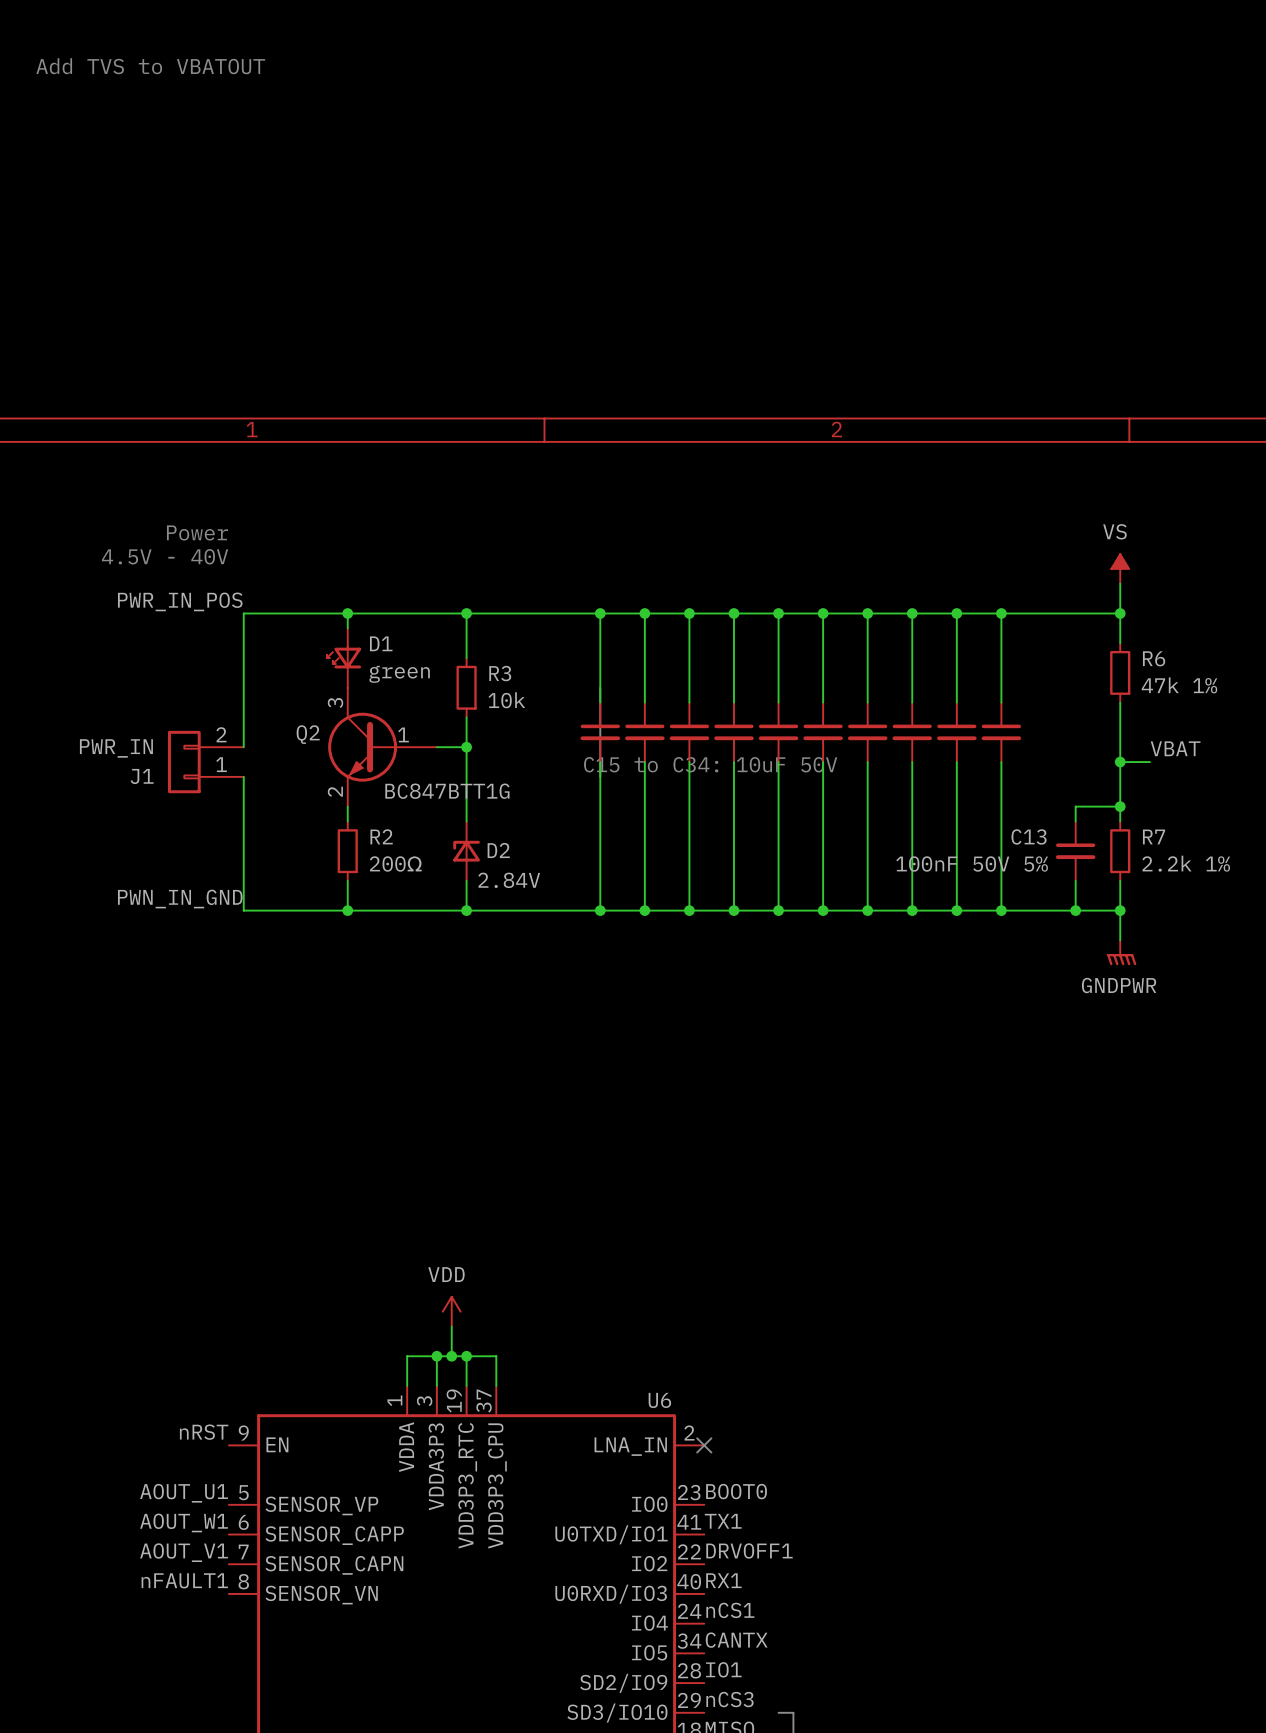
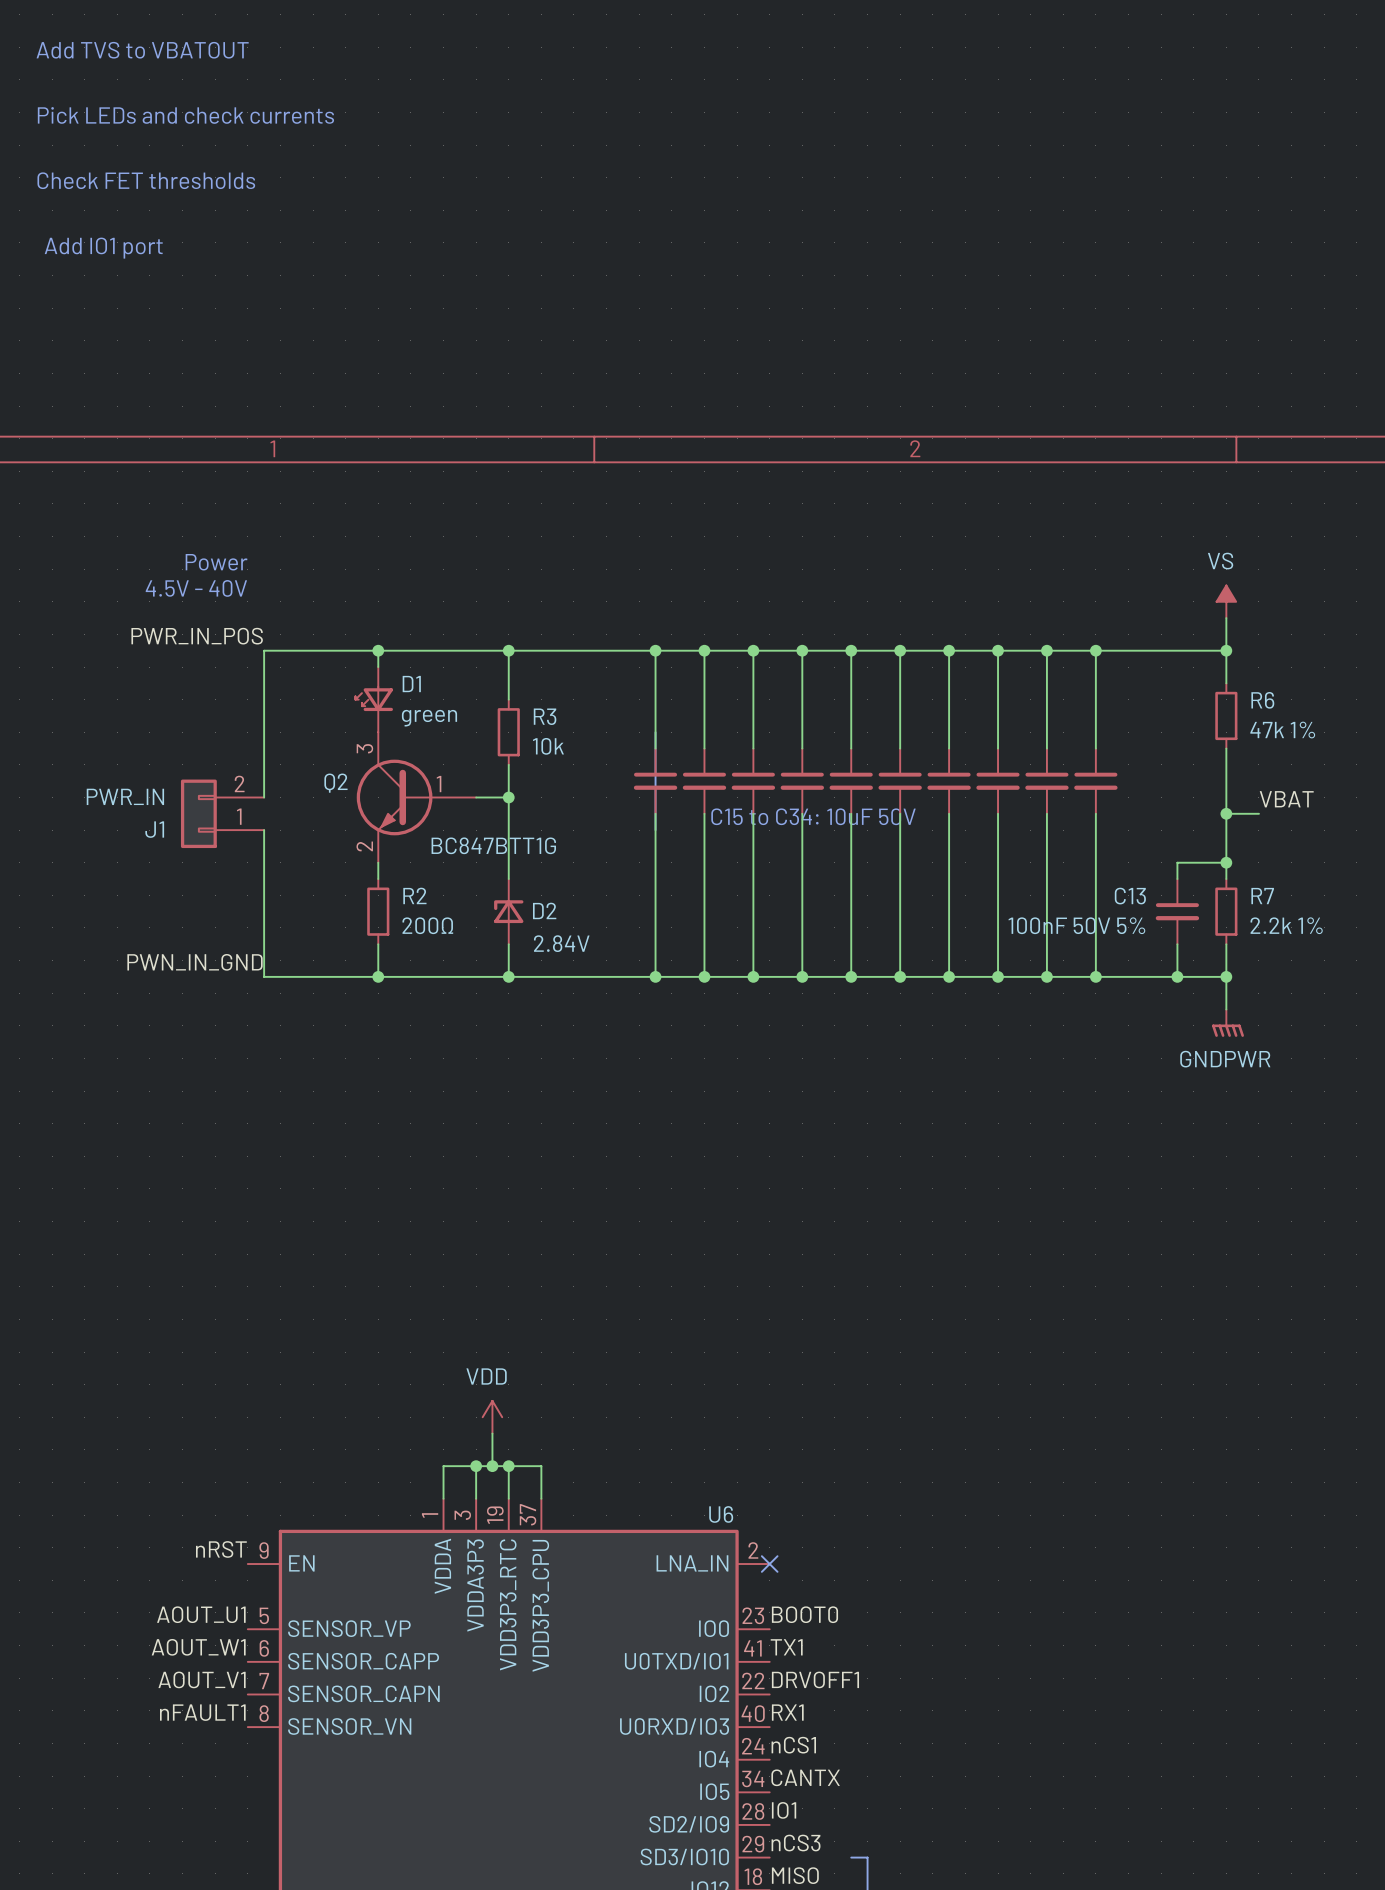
text: none -> Pick LEDs and check currents (185, 115)
text: none -> Check FET thresholds (146, 180)
text: none -> Add IO1 port (103, 248)

